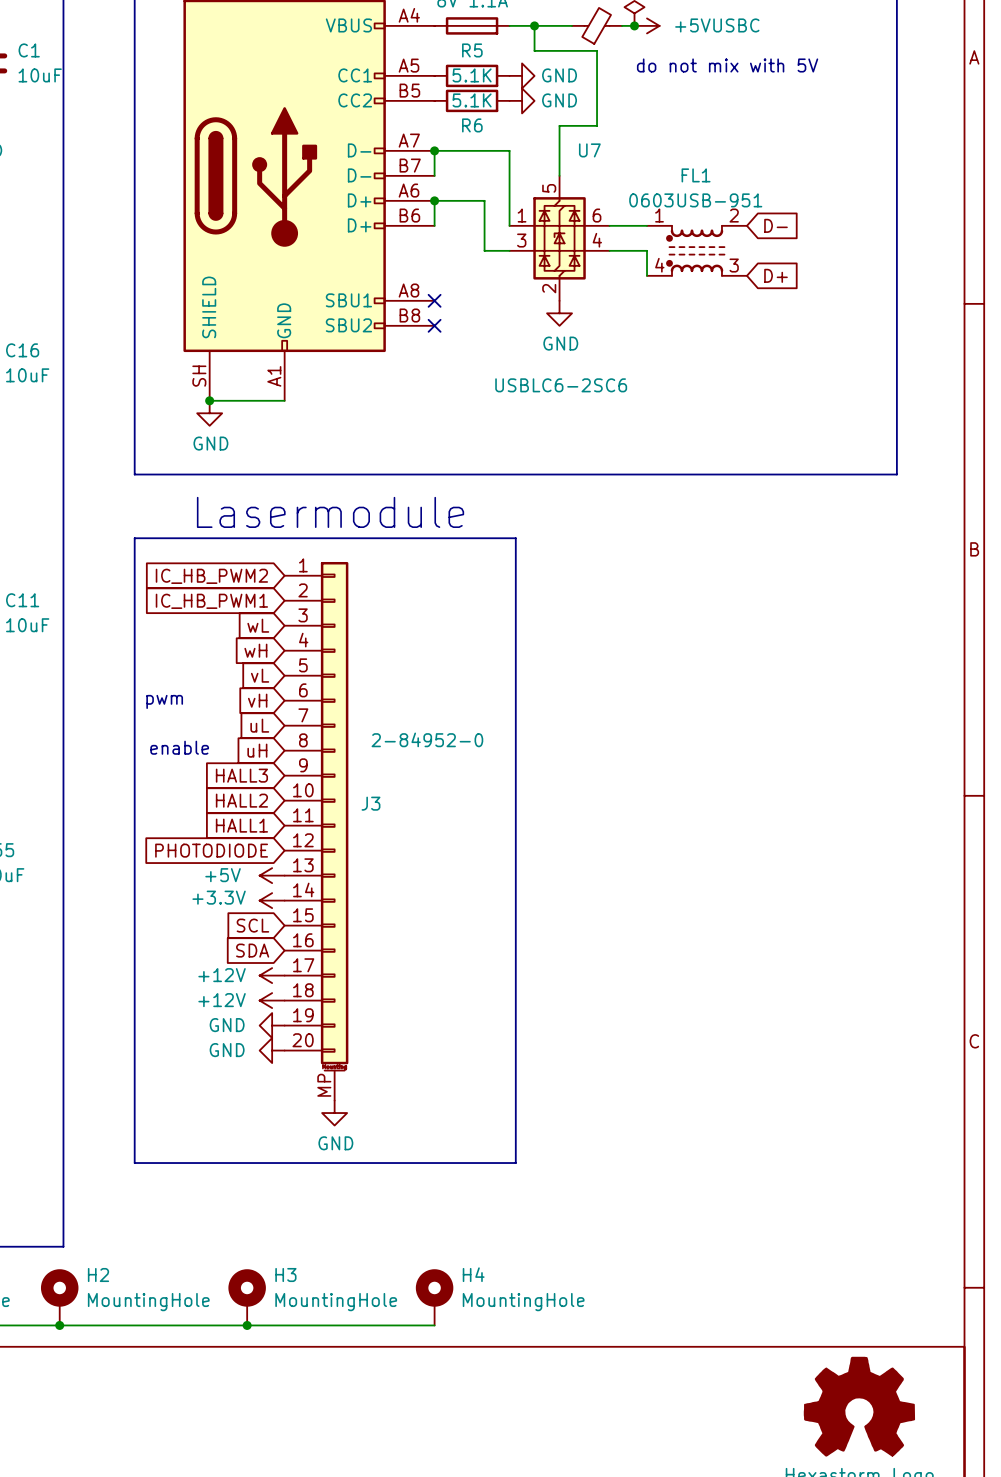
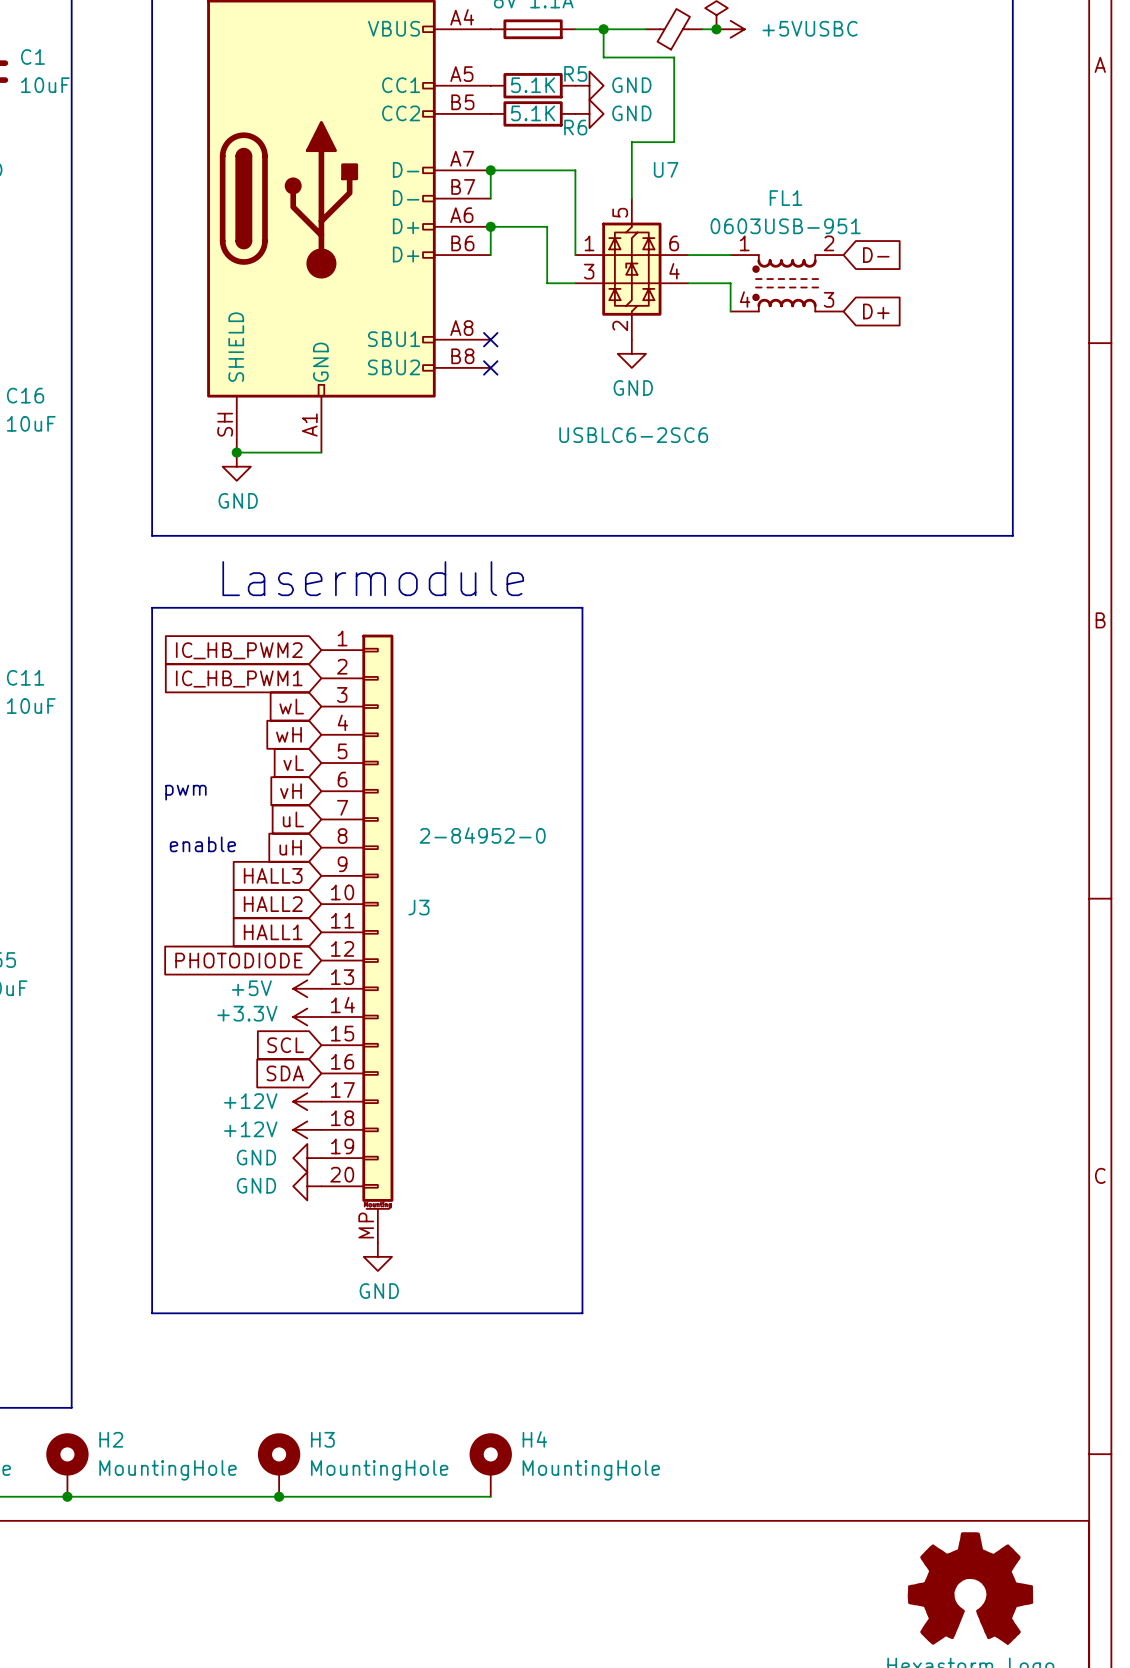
R5 name position: R5 (472, 50) -> R5 (575, 73)
text: do not mix with 5V (727, 65) -> none
R6 name position: R6 (472, 125) -> R6 (575, 127)

